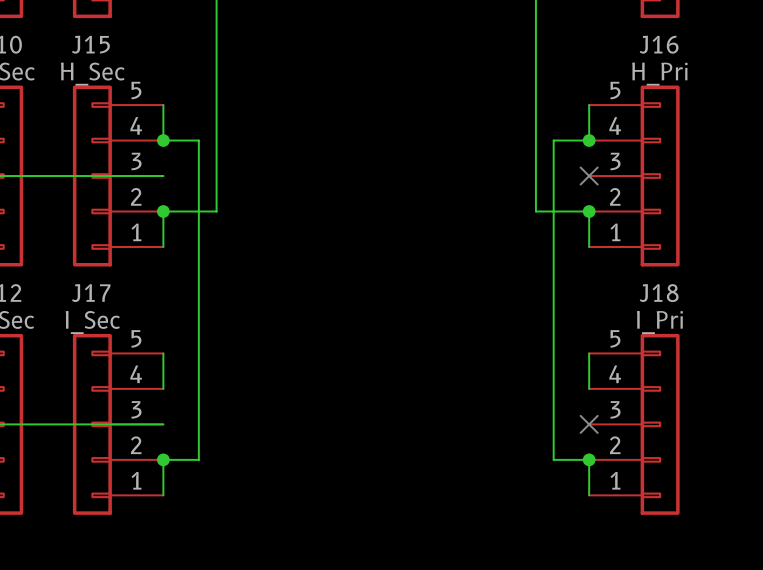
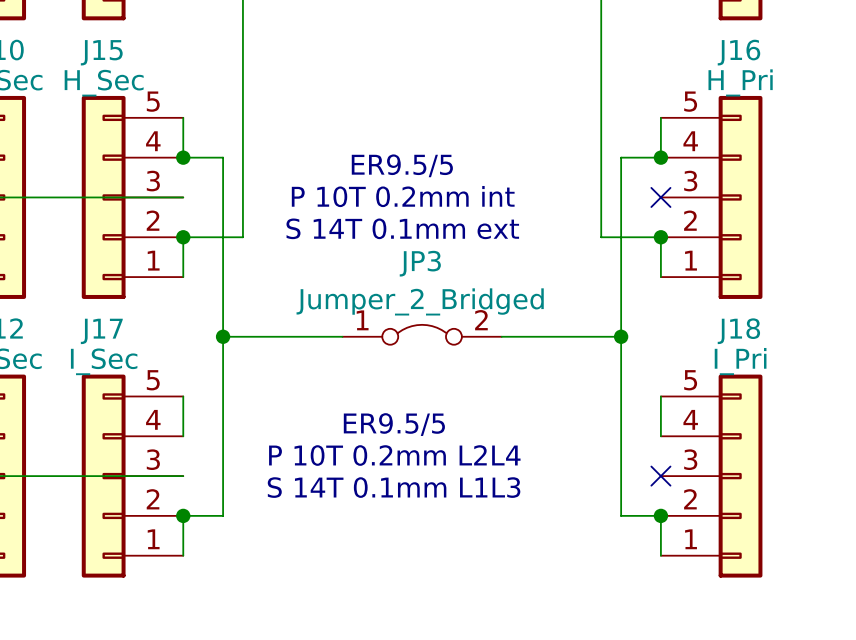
text: none -> ER9.5/5 (402, 165)
text: none -> P 10T 0.2mm int (403, 196)
text: none -> S 14T 0.1mm ext (402, 228)
JP3: none -> Jumper_2_Bridged (422, 334)
wire: none -> (223, 336) (342, 336)
junction: none -> (223, 336)
wire: none -> (501, 336) (621, 336)
junction: none -> (621, 336)
text: none -> ER9.5/5 (394, 424)
text: none -> P 10T 0.2mm L2L4 (394, 455)
text: none -> S 14T 0.1mm L1L3 (394, 487)

